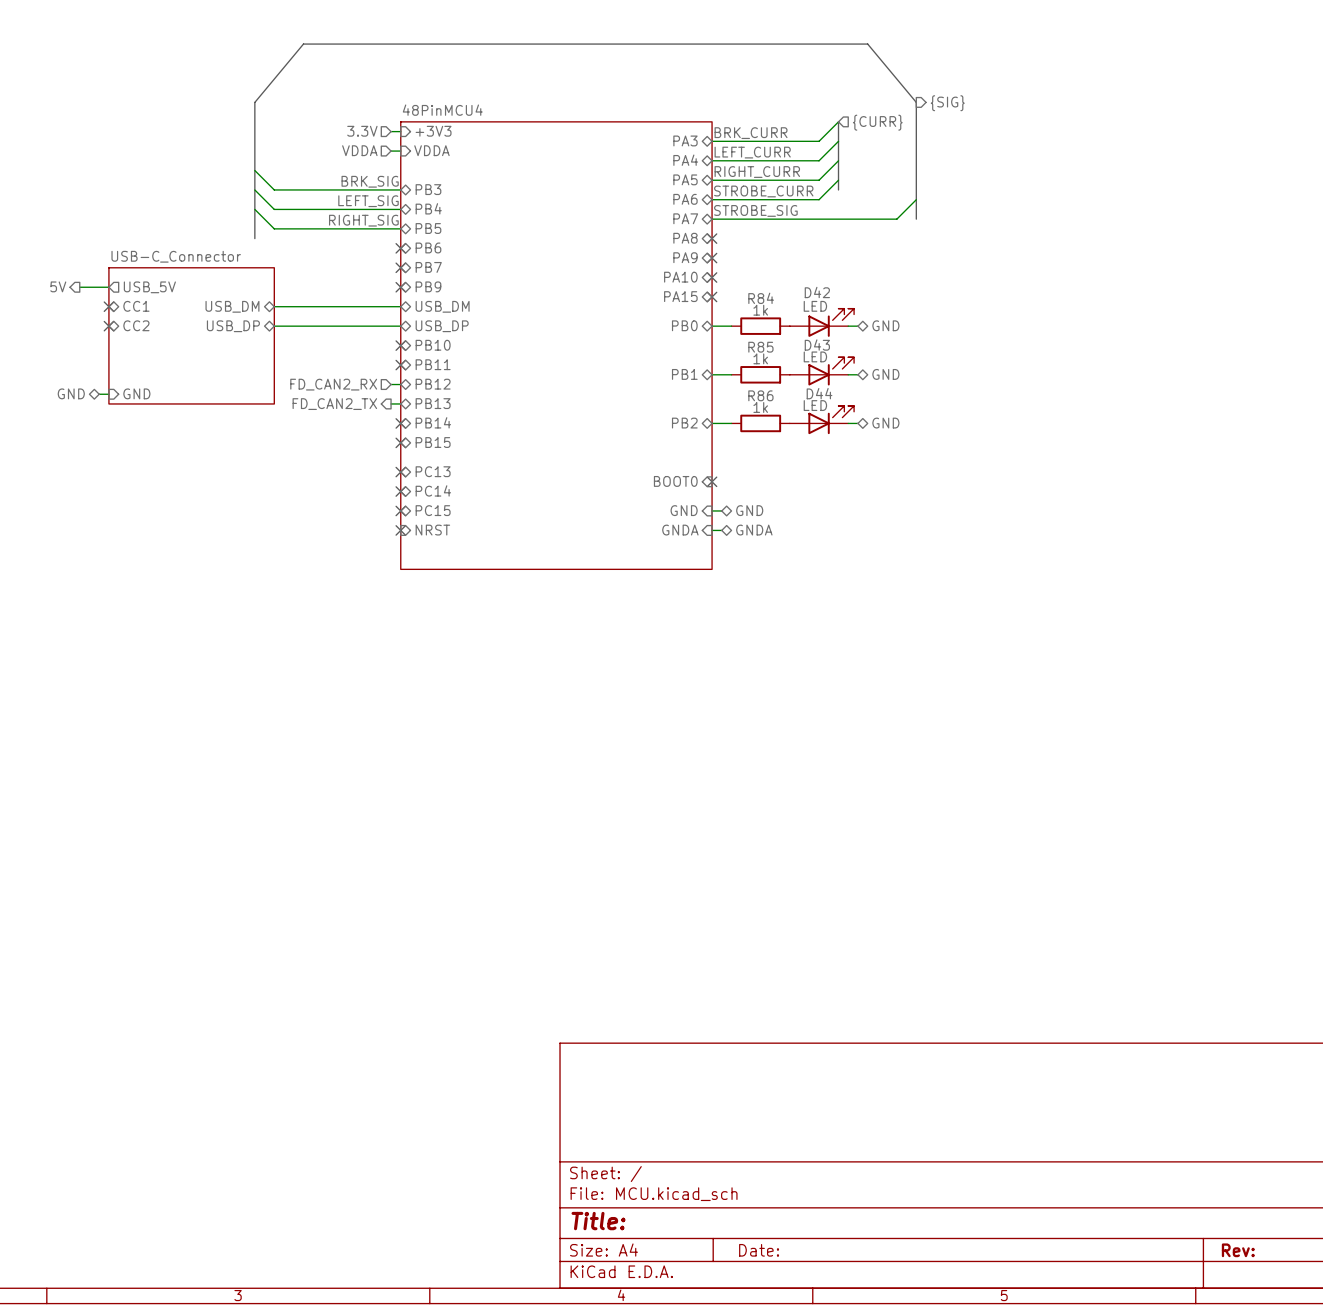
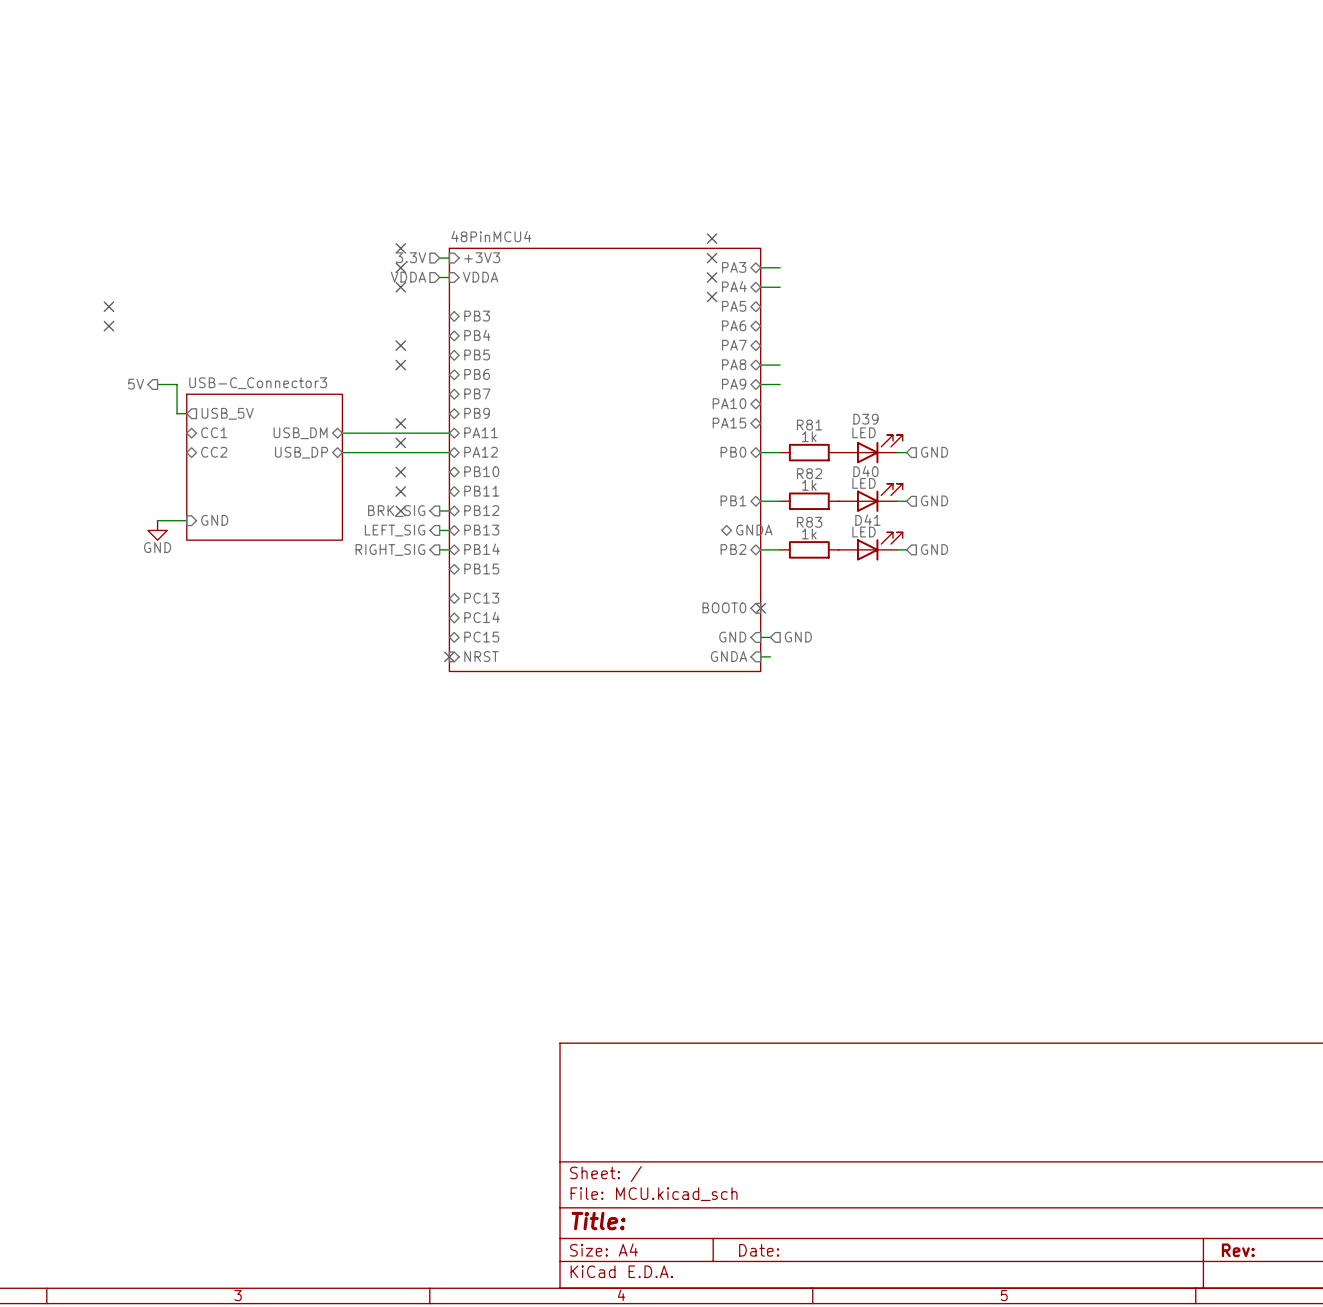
hierarchical label: {SIG} (947, 103) -> none
sheet 48PinMCU4 shape: [400, 121, 713, 570] -> [448, 247, 762, 673]
wire: (838, 121) (819, 141) (712, 141) -> none
bus: (838, 121) (838, 189) -> none
hierarchical label: {CURR} (877, 122) -> none
hierarchical label position: 3.3V (362, 131) -> 3.3V (411, 257)
wire: (391, 131) (400, 131) -> (439, 258) (449, 258)
sheet pin position: +3V3 (433, 131) -> +3V3 (482, 257)
label: BRK_CURR (751, 133) -> none
sheet pin position: PA3 (685, 140) -> PA3 (734, 267)
wire: (838, 141) (819, 160) (712, 160) -> none
hierarchical label position: VDDA (359, 150) -> VDDA (408, 277)
sheet pin position: VDDA (431, 150) -> VDDA (480, 277)
wire: (391, 151) (400, 151) -> (439, 277) (449, 277)
label: LEFT_CURR (752, 152) -> none
sheet pin position: PA4 (685, 160) -> PA4 (734, 286)
wire: (838, 160) (819, 180) (712, 180) -> none
wire: (254, 170) (274, 189) (400, 189) -> none
label: RIGHT_CURR (757, 172) -> none
sheet pin position: PA5 (685, 179) -> PA5 (734, 306)
wire: (838, 180) (819, 199) (712, 199) -> none
label: BRK_SIG (370, 181) -> none
wire: (254, 189) (274, 209) (400, 209) -> none
sheet pin position: PB3 (428, 189) -> PB3 (477, 316)
label: STROBE_CURR (763, 191) -> none
sheet pin position: PA6 (685, 199) -> PA6 (734, 325)
wire: (916, 199) (896, 219) (712, 219) -> none
label: LEFT_SIG (368, 201) -> none
sheet pin position: PB4 (428, 208) -> PB4 (477, 335)
wire: (254, 209) (274, 228) (400, 228) -> none
label: STROBE_SIG (755, 210) -> none
sheet pin position: PA7 (685, 218) -> PA7 (734, 345)
bus: (916, 219) (916, 102) (867, 44) (303, 44) (254, 102) (254, 238) -> none
label: RIGHT_SIG (363, 220) -> none
sheet pin position: PB5 (428, 228) -> PB5 (477, 354)
sheet pin position: PA8 (685, 238) -> PA8 (734, 364)
sheet pin position: PB6 (428, 247) -> PB6 (477, 374)
sheet pin position: PA9 (685, 257) -> PA9 (734, 384)
sheet pin position: PB7 (428, 267) -> PB7 (477, 393)
wire: none -> (760, 267) (780, 267)
sheet pin position: PA10 (680, 277) -> PA10 (729, 403)
hierarchical label position: 5V (58, 286) -> 5V (136, 384)
sheet pin position: PB9 (428, 286) -> PB9 (477, 413)
wire: (79, 287) (108, 287) -> none
sheet pin position: USB_5V (149, 287) -> USB_5V (227, 413)
wire: none -> (760, 287) (780, 287)
sheet pin position: PA15 (680, 296) -> PA15 (729, 423)
sheet pin position: CC1 (136, 306) -> CC1 (214, 432)
sheet pin: USB_DM (232, 306) -> none
wire: (274, 306) (400, 306) -> none
sheet pin: USB_DM (442, 306) -> none
D42: LED (821, 322) -> none
sheet pin position: CC2 (136, 325) -> CC2 (214, 452)
sheet pin position: PB0 (684, 325) -> PB0 (733, 452)
hierarchical label: GND (885, 325) -> none
sheet pin: USB_DP (233, 326) -> none
wire: (274, 326) (400, 326) -> none
sheet pin: USB_DP (442, 326) -> none
wire: (712, 326) (731, 326) -> (760, 452) (780, 452)
R84: 1k (760, 326) -> none
wire: (848, 326) (857, 326) -> (896, 452) (906, 452)
sheet USB-C_Connector: (191, 335) -> none
sheet pin position: PB10 (433, 345) -> PB10 (481, 471)
sheet pin position: PB11 (433, 364) -> PB11 (481, 491)
wire: none -> (760, 365) (780, 365)
D43: LED (821, 371) -> none
sheet pin position: PB1 (684, 374) -> PB1 (733, 500)
wire: (712, 374) (731, 374) -> (760, 501) (780, 501)
R85: 1k (760, 374) -> none
wire: (848, 374) (857, 374) -> (896, 501) (906, 501)
hierarchical label: GND (885, 374) -> none
wire: none -> (157, 384) (177, 384) (177, 413) (186, 413)
hierarchical label: FD_CAN2_RX (333, 384) -> none
wire: (391, 384) (400, 384) -> (439, 510) (449, 510)
sheet pin position: PB12 (433, 384) -> PB12 (481, 510)
wire: none -> (760, 384) (780, 384)
hierarchical label: GND (71, 393) -> none
sheet pin position: GND (136, 393) -> GND (214, 520)
wire: (99, 394) (108, 394) -> none
wire: (391, 403) (400, 403) -> (439, 530) (449, 530)
sheet pin position: PB13 (433, 403) -> PB13 (481, 530)
hierarchical label: FD_CAN2_TX (334, 404) -> none
D44: LED (821, 420) -> none
sheet pin position: PB14 (433, 422) -> PB14 (481, 549)
sheet pin position: PB2 (684, 423) -> PB2 (733, 549)
wire: (712, 423) (731, 423) -> (760, 549) (780, 549)
R86: 1k (760, 423) -> none
wire: (848, 423) (857, 423) -> (896, 549) (906, 549)
hierarchical label: GND (885, 423) -> none
sheet pin: none -> PA11 (481, 432)
sheet pin: none -> USB_DM (300, 433)
wire: none -> (342, 433) (449, 433)
sheet pin position: PB15 (433, 442) -> PB15 (481, 568)
D39: none -> LED (870, 449)
sheet pin: none -> USB_DP (301, 452)
wire: none -> (342, 452) (449, 452)
sheet pin: none -> PA12 (481, 452)
R81: none -> 1k (809, 452)
hierarchical label: none -> GND (934, 452)
sheet USB-C_Connector3: none -> (264, 467)
sheet pin position: PC13 (433, 471) -> PC13 (481, 598)
sheet pin position: BOOT0 (675, 481) -> BOOT0 (724, 607)
no-connect mark: (712, 481) -> none
sheet pin position: PC14 (433, 490) -> PC14 (481, 617)
D40: none -> LED (870, 497)
hierarchical label: none -> GND (934, 500)
R82: none -> 1k (809, 501)
sheet pin position: PC15 (433, 510) -> PC15 (481, 637)
sheet pin position: GND (684, 510) -> GND (732, 637)
wire: (712, 510) (721, 510) -> (760, 637) (770, 637)
hierarchical label: GND (749, 510) -> none
hierarchical label: none -> BRK_SIG (396, 511)
wire: none -> (157, 520) (186, 520)
power symbol: none -> GND (157, 530)
hierarchical label: none -> LEFT_SIG (395, 530)
no-connect mark: (400, 530) -> none
sheet pin position: NRST (432, 530) -> NRST (481, 656)
sheet pin position: GNDA (680, 530) -> GNDA (729, 656)
wire: (712, 530) (721, 530) -> (760, 656) (770, 656)
D41: none -> LED (870, 546)
hierarchical label: none -> RIGHT_SIG (390, 549)
wire: none -> (439, 549) (449, 549)
R83: none -> 1k (809, 549)
hierarchical label: none -> GND (934, 549)
no-connect mark: none -> (760, 608)
hierarchical label: none -> GND (798, 637)
no-connect mark: none -> (449, 656)

